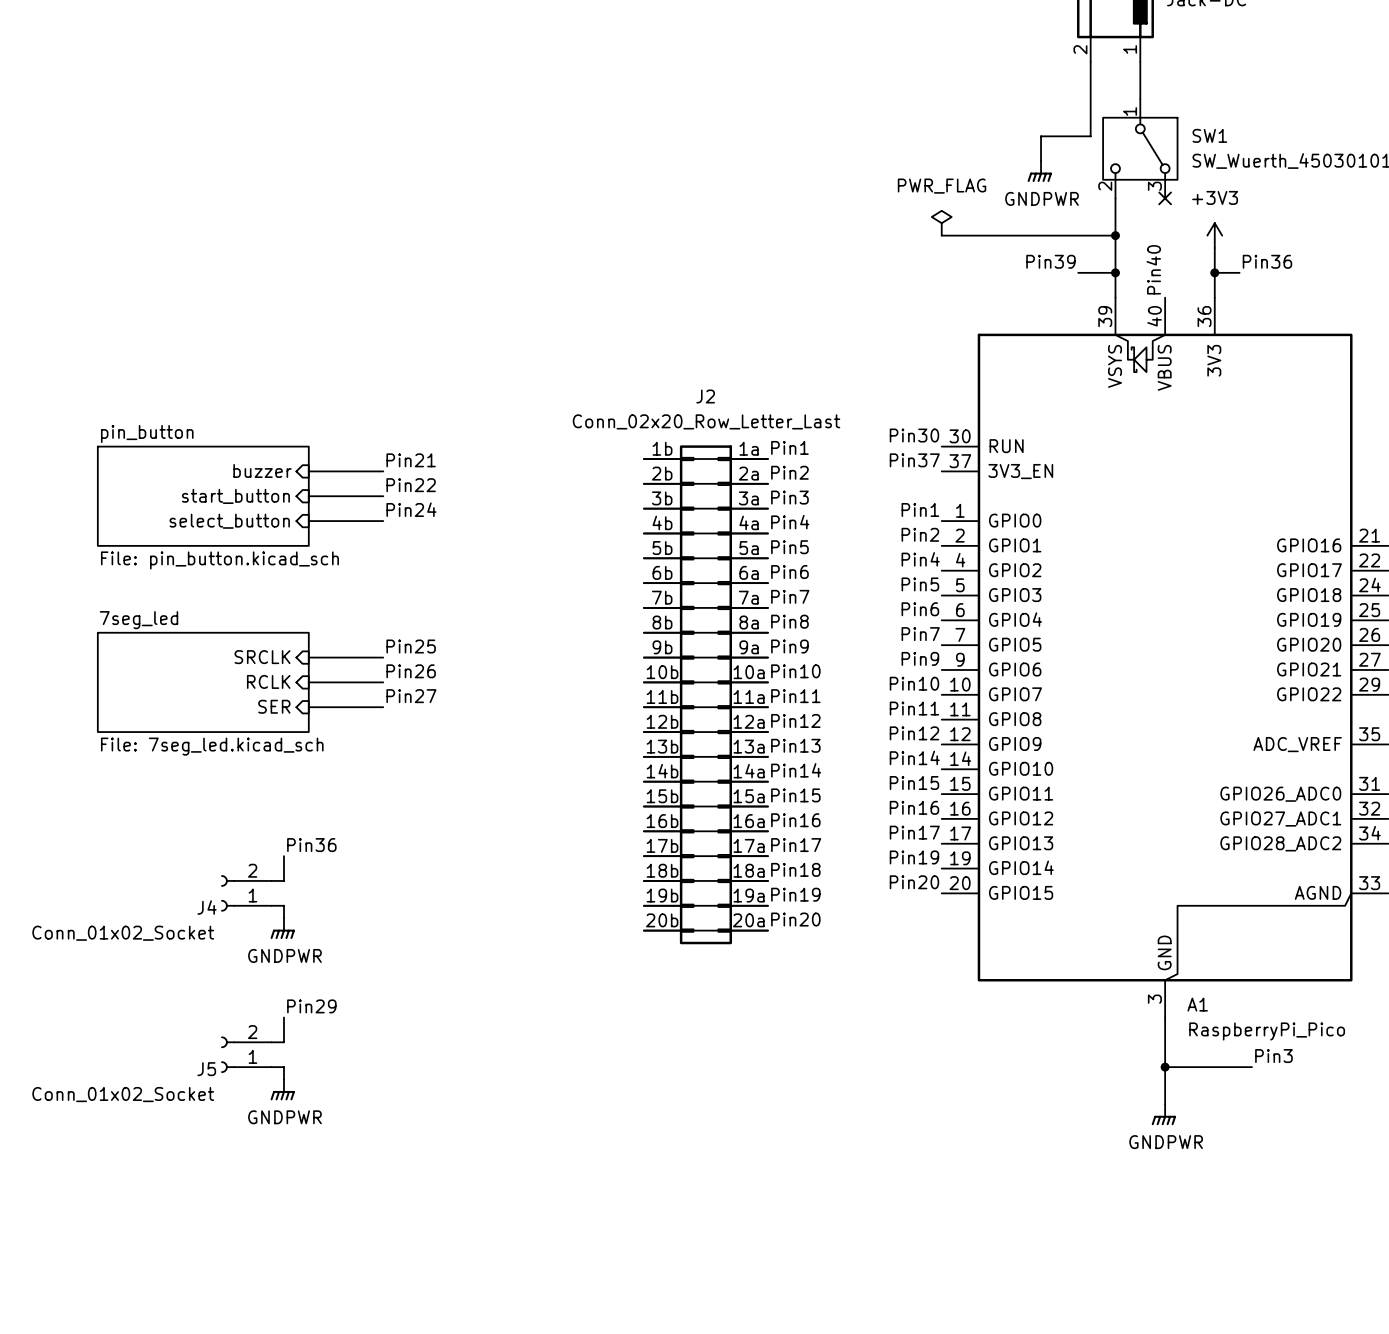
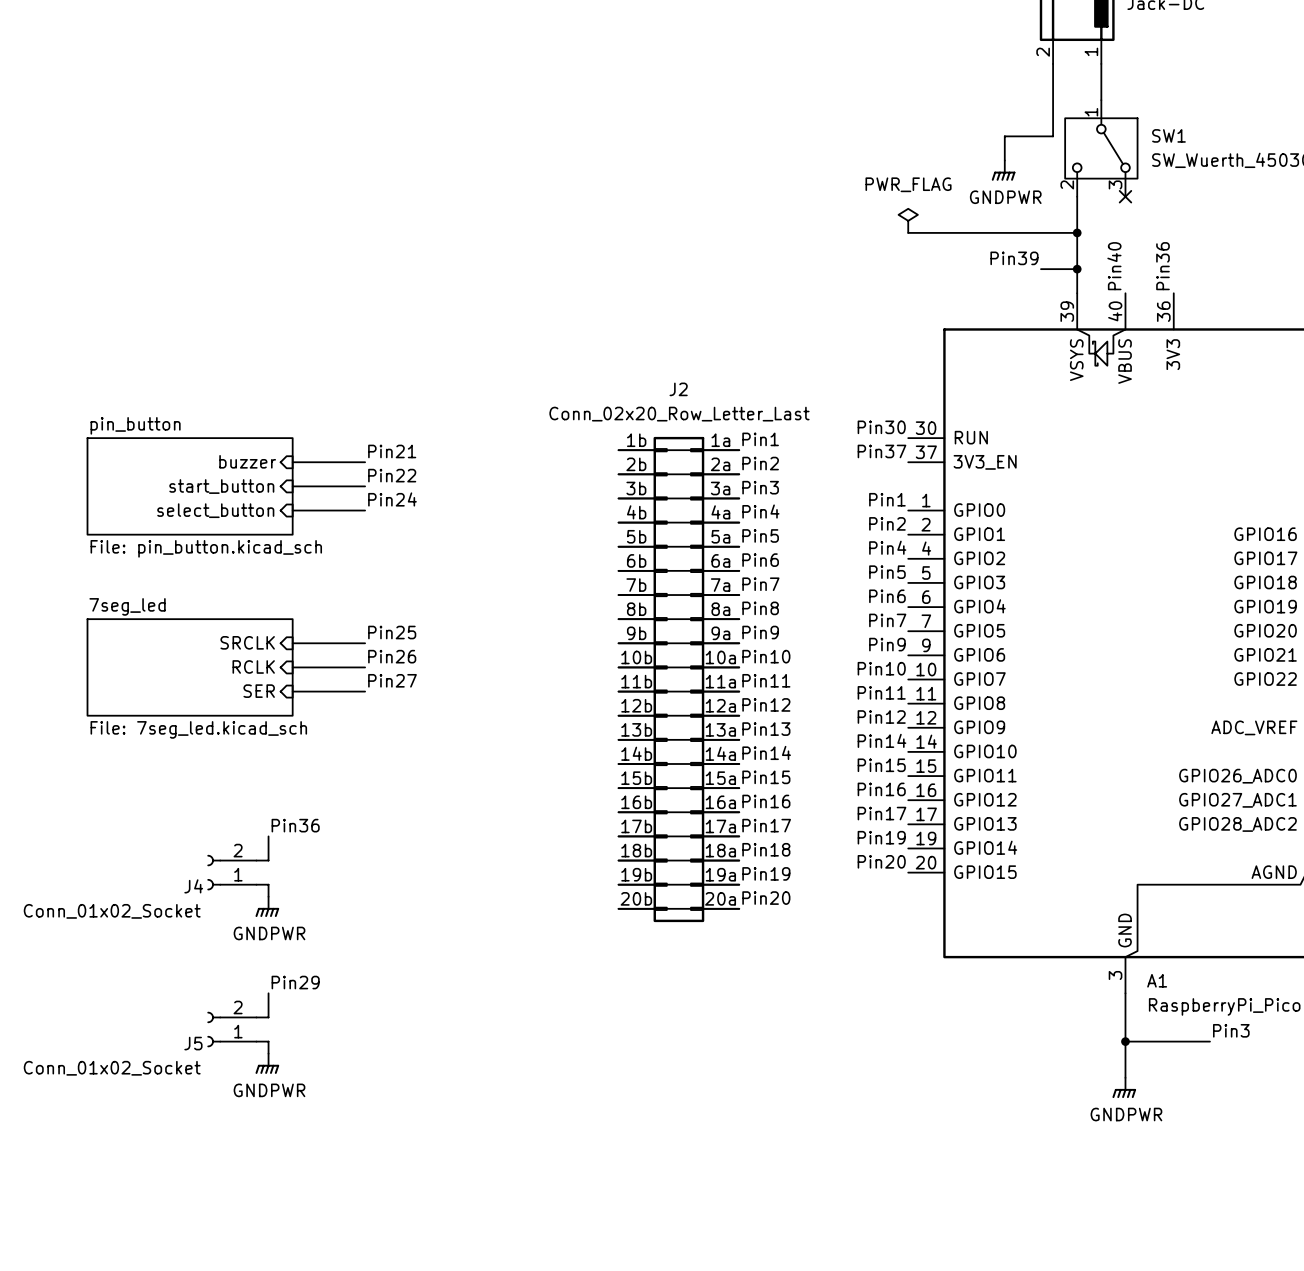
power symbol: +3V3 (1214, 235) -> none
wire: (1214, 248) (1214, 297) -> none
label rotation: 0° (1267, 261) -> 90° counterclockwise (1162, 266)
label position: Pin36 (1267, 261) -> Pin36 (1162, 266)
wire: (1214, 272) (1239, 272) -> none
junction: (1214, 272) -> none

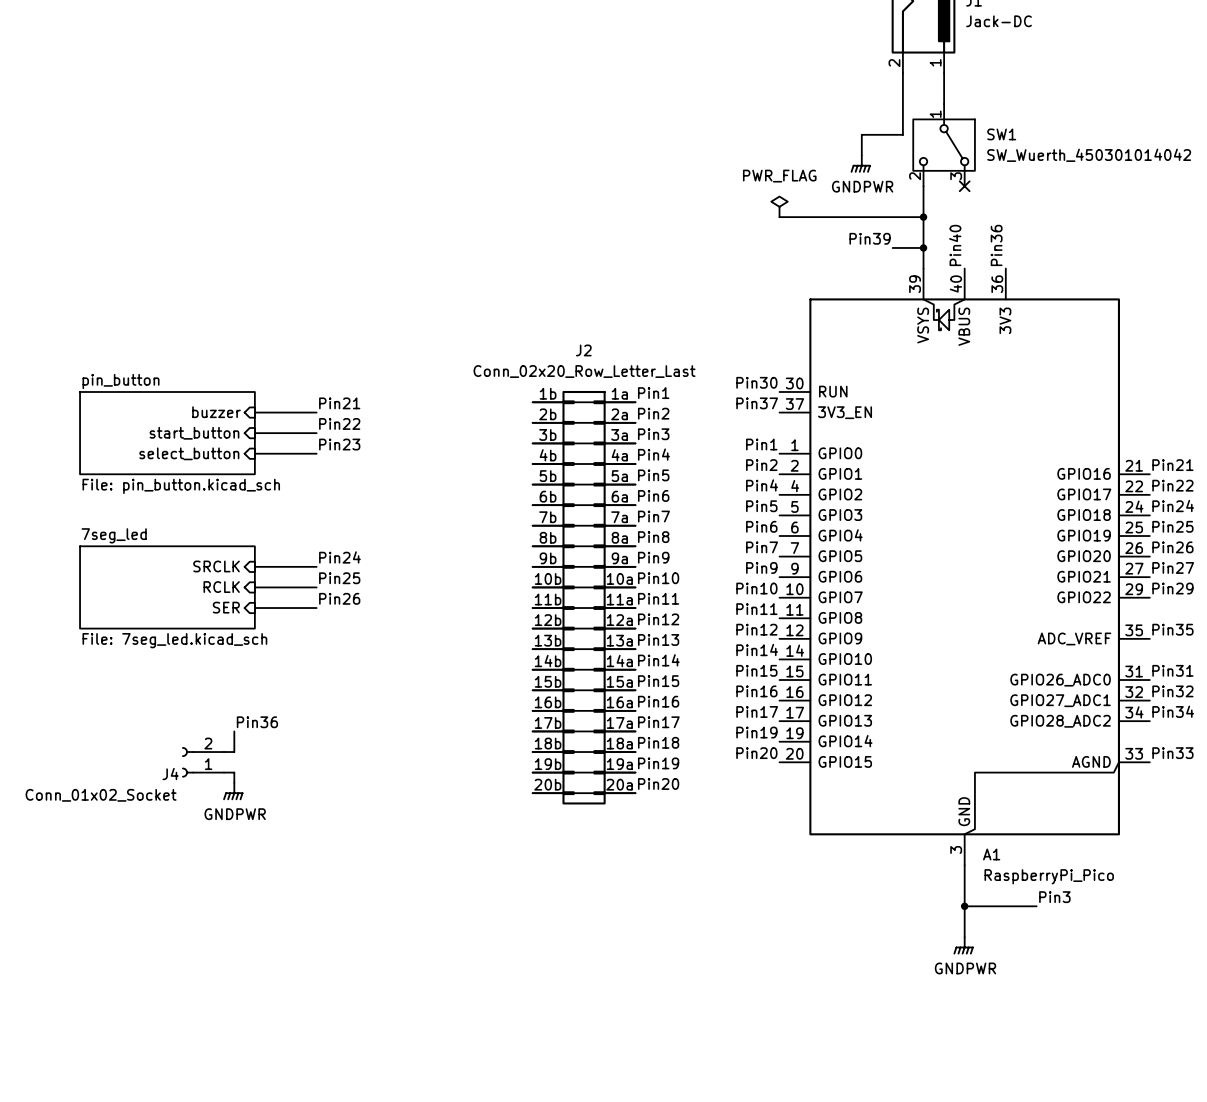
label: Pin24 (392, 499) -> Pin23 (339, 444)
label: Pin25 (392, 632) -> Pin24 (339, 557)
label: Pin26 (392, 656) -> Pin25 (339, 578)
label: Pin27 (392, 680) -> Pin26 (339, 598)
label: Pin29 (295, 982) -> none
wire: (268, 993) (268, 1017) (256, 1017) -> none
J5: Conn_01x02_Socket (231, 1029) -> none
wire: (256, 1041) (268, 1041) (268, 1053) -> none
power symbol: GNDPWR (267, 1063) -> none

